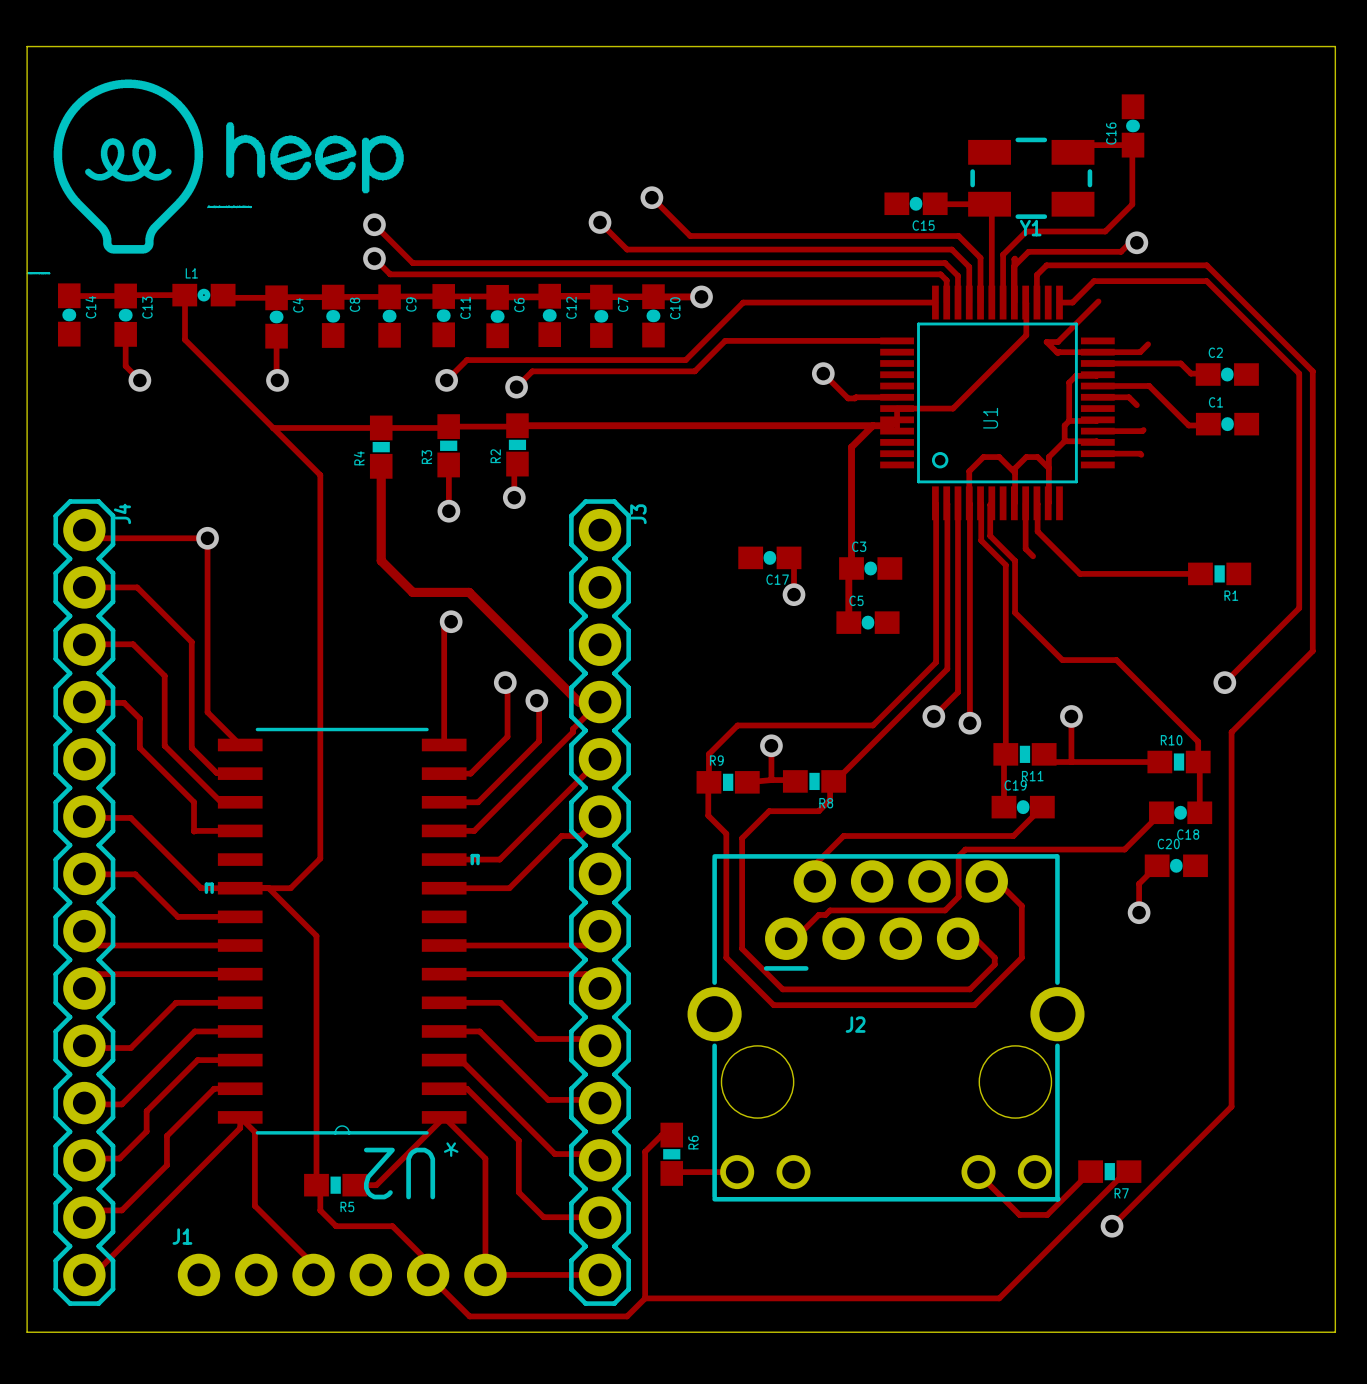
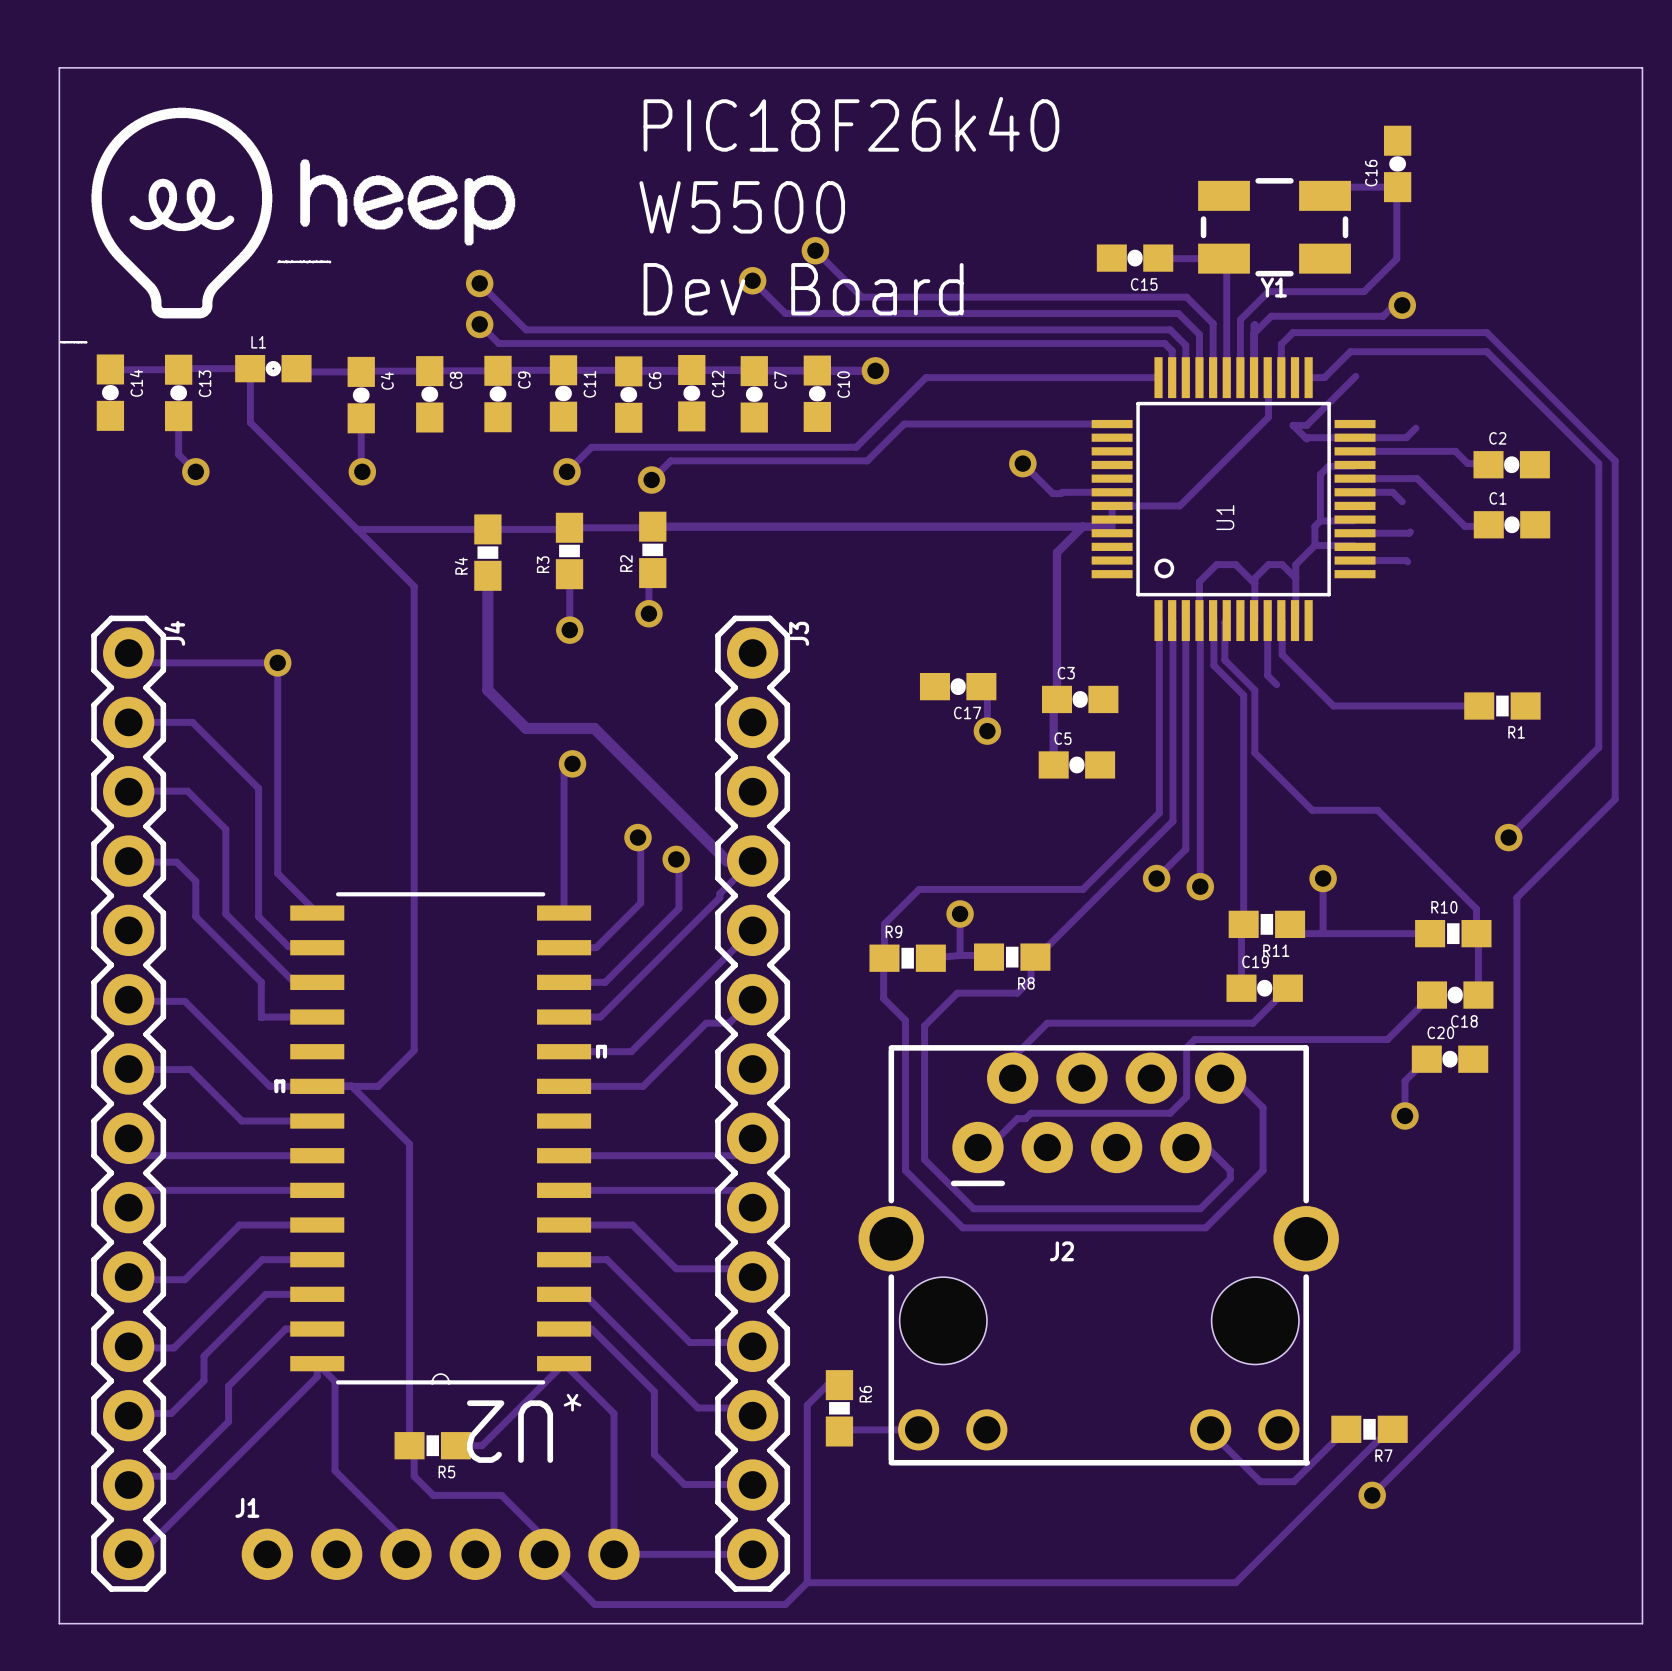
text: none -> PIC18F26k40 (851, 124)
text: none -> W5500 (742, 207)
text: none -> Dev Board (803, 289)

